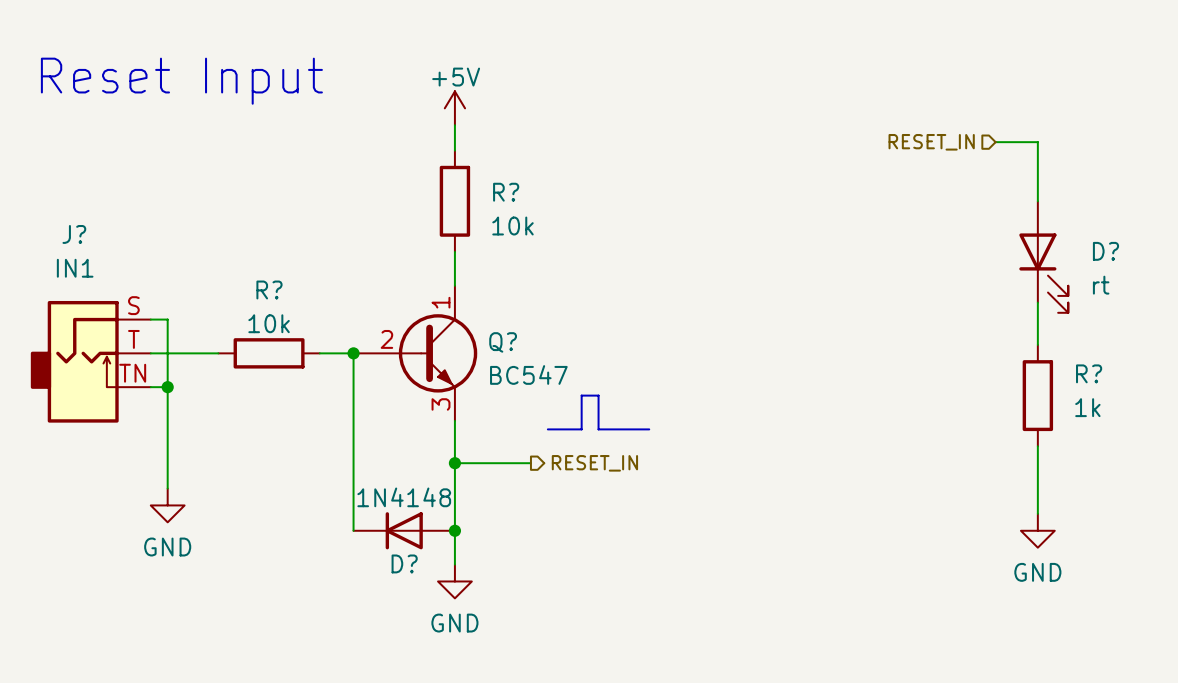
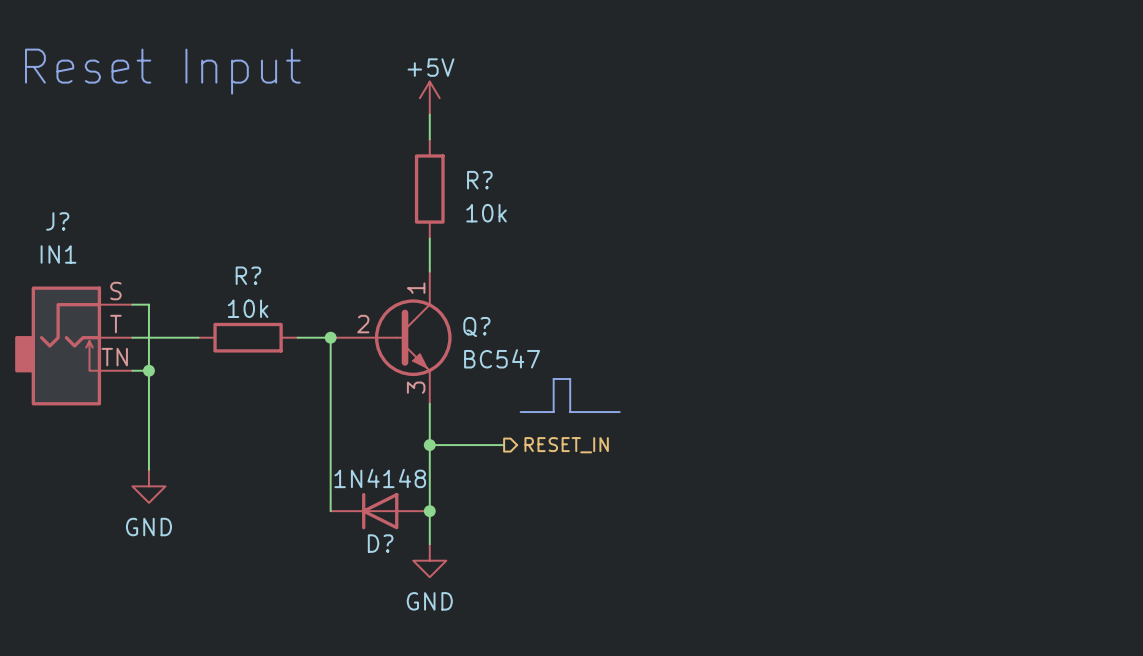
hierarchical label: RESET_IN (931, 142) -> none
wire: (995, 142) (1037, 142) (1037, 201) -> none
D?: rt (1043, 257) -> none
wire: (1037, 302) (1037, 344) -> none
R?: 1k (1037, 395) -> none
wire: (1037, 446) (1037, 513) -> none
power symbol: GND (1037, 530) -> none

